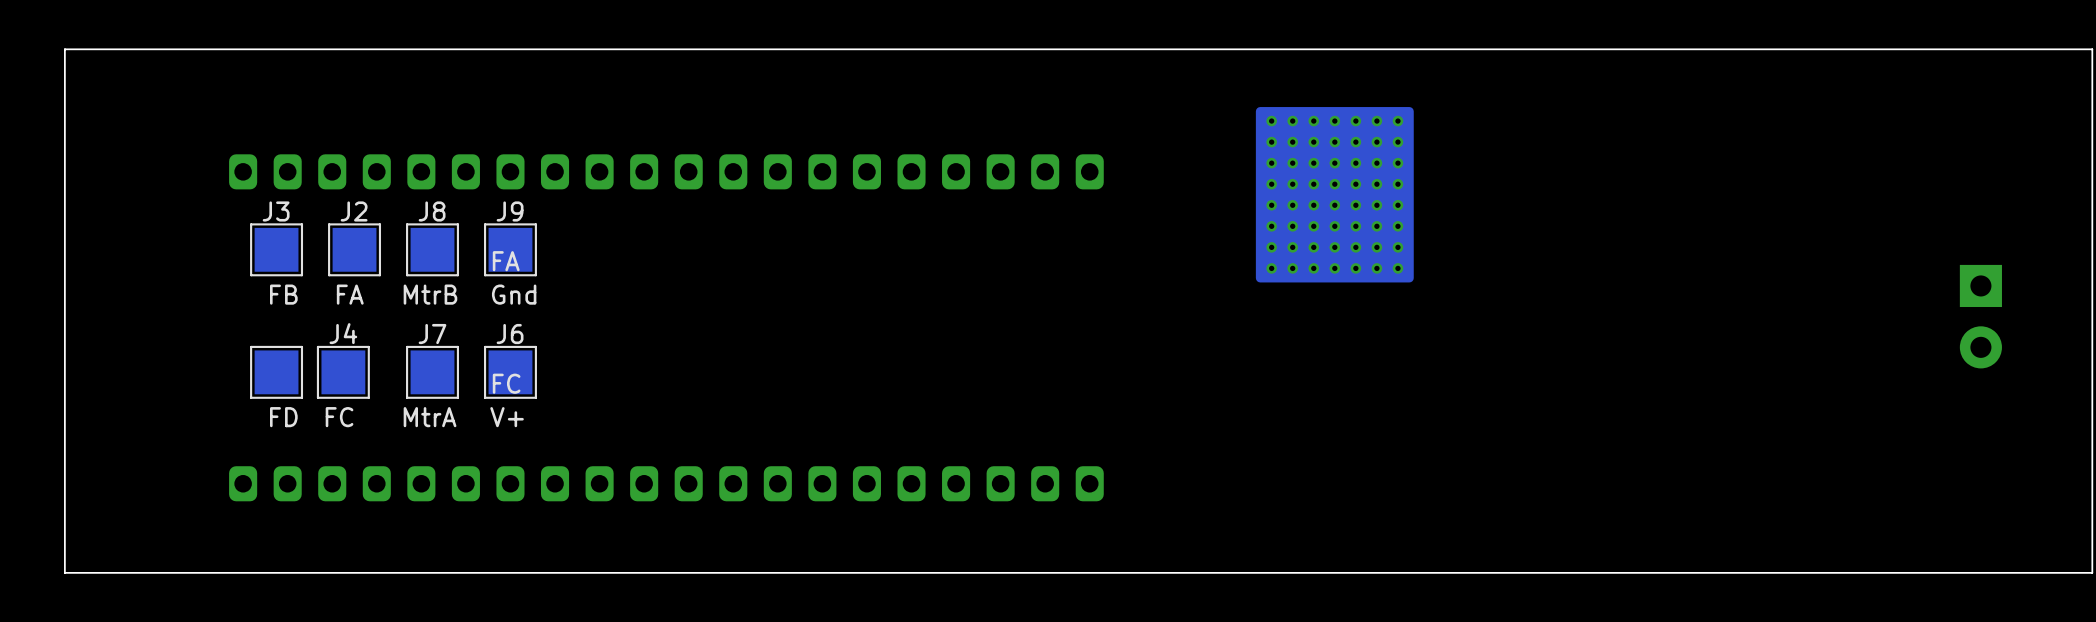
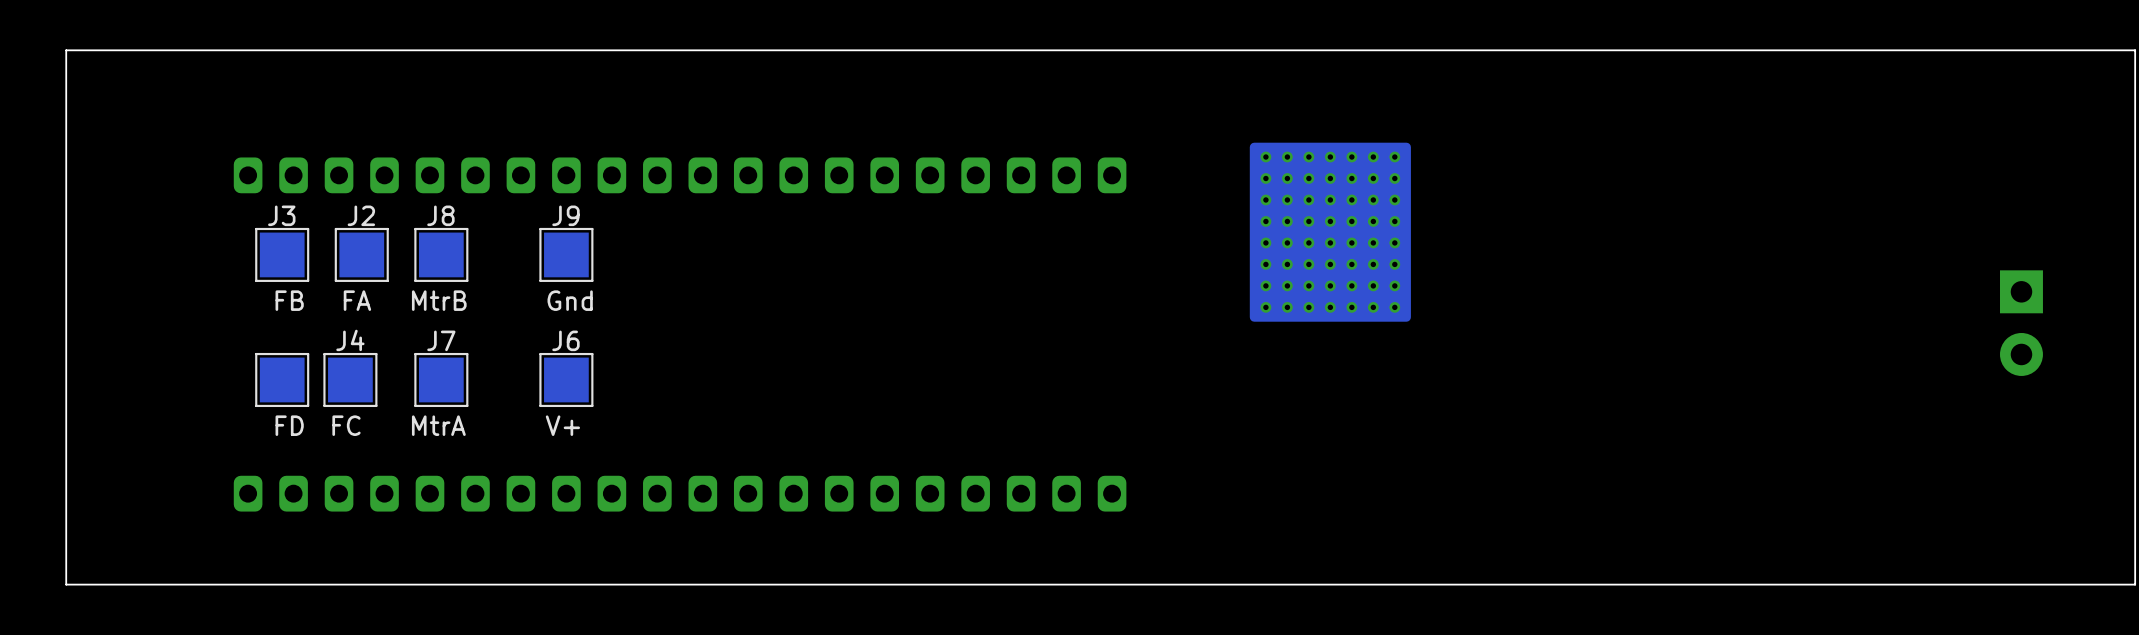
part position: (1334, 194) -> (1330, 232)
J9 position: (510, 249) -> (566, 254)
text: FA (506, 261) -> none
text position: Gnd (514, 294) -> Gnd (570, 300)
J6 position: (510, 372) -> (566, 379)
text: FC (506, 383) -> none
text position: V+ (507, 417) -> V+ (562, 425)

